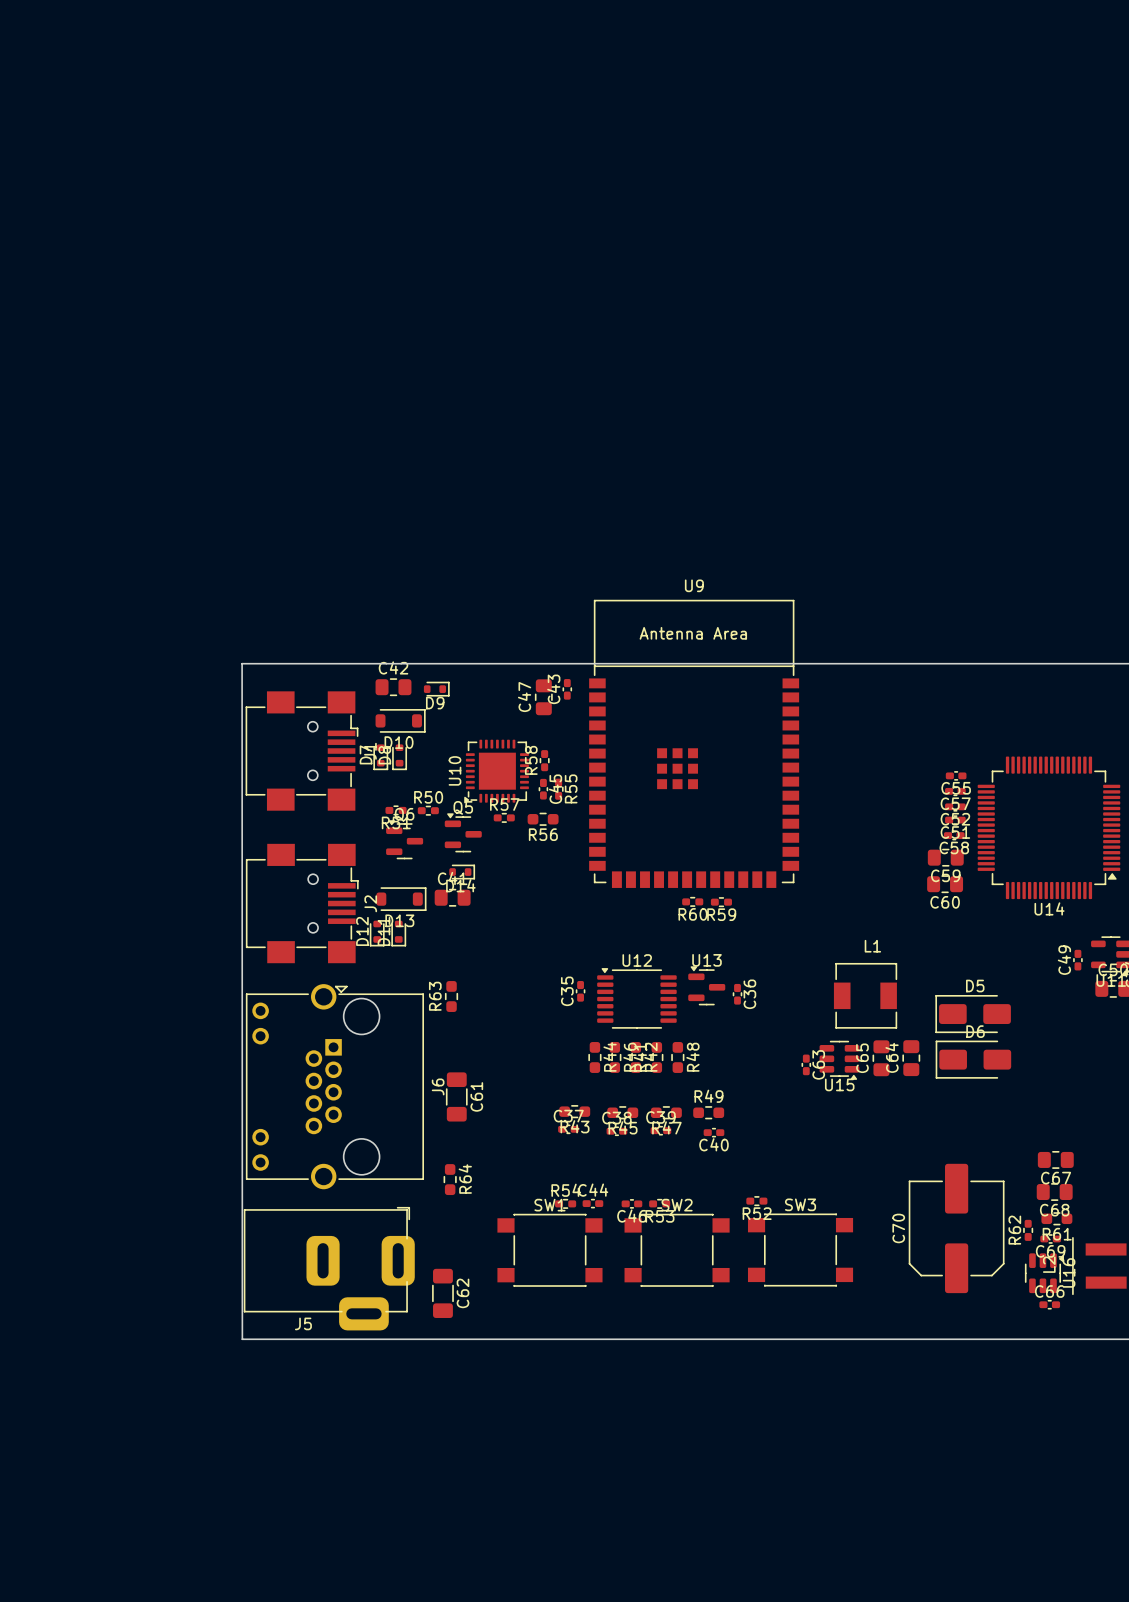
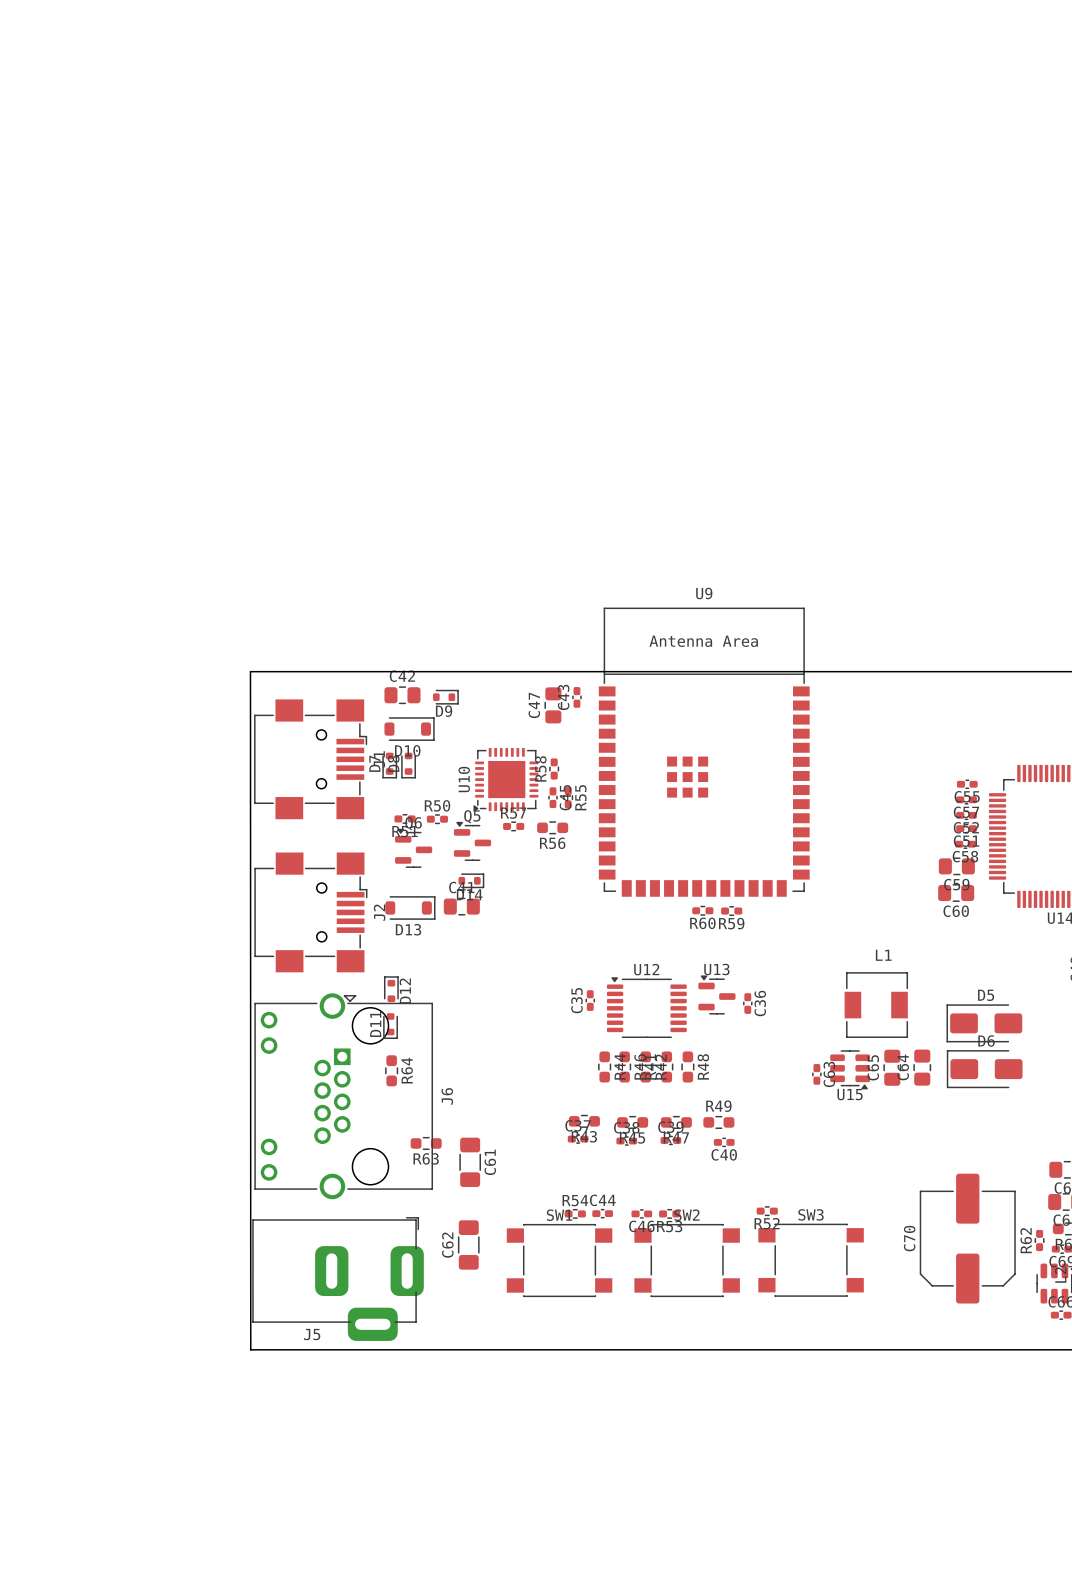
D12 rotation: 0° (377, 933) -> 180° (391, 989)
D12 position: (377, 933) -> (391, 989)
D11 position: (398, 933) -> (390, 1026)
R63 name position: R63 (435, 996) -> R63 (426, 1158)
R63 rotation: 0° (451, 996) -> 90° clockwise (426, 1143)
R63 position: (451, 996) -> (426, 1143)
C61 position: (456, 1096) -> (470, 1162)
R64 position: (450, 1179) -> (391, 1070)
C62 position: (442, 1293) -> (468, 1244)
C62 name position: C62 (462, 1293) -> C62 (447, 1245)

